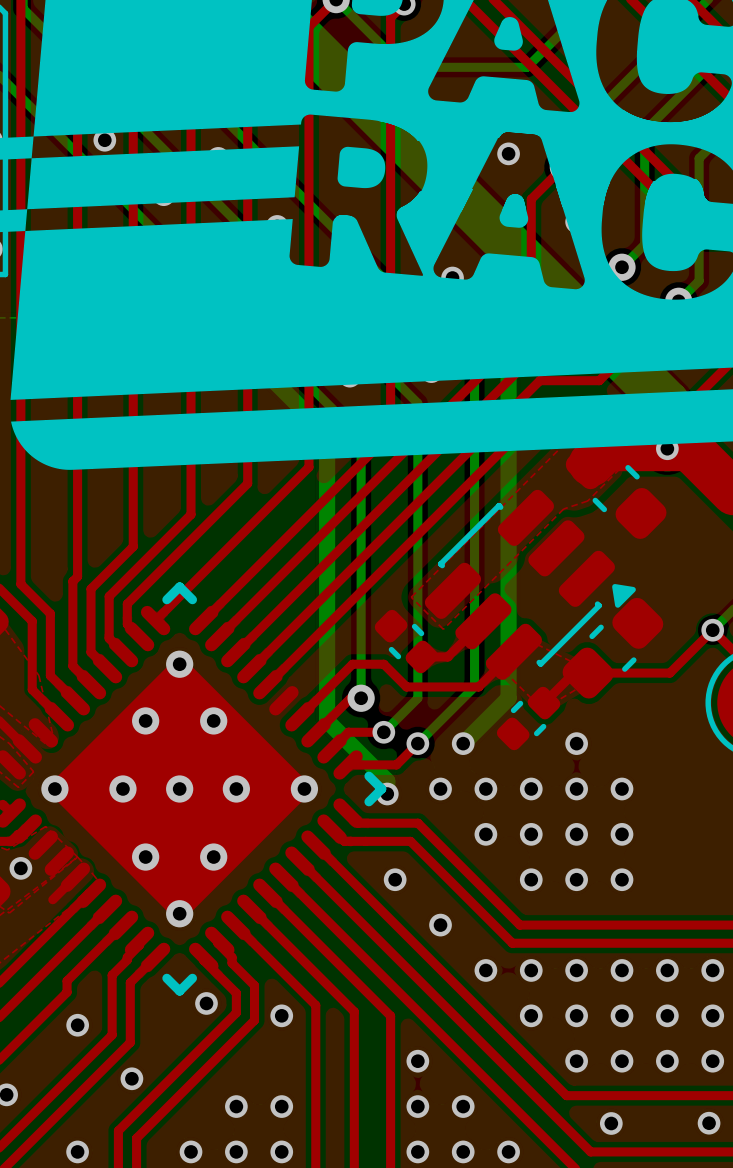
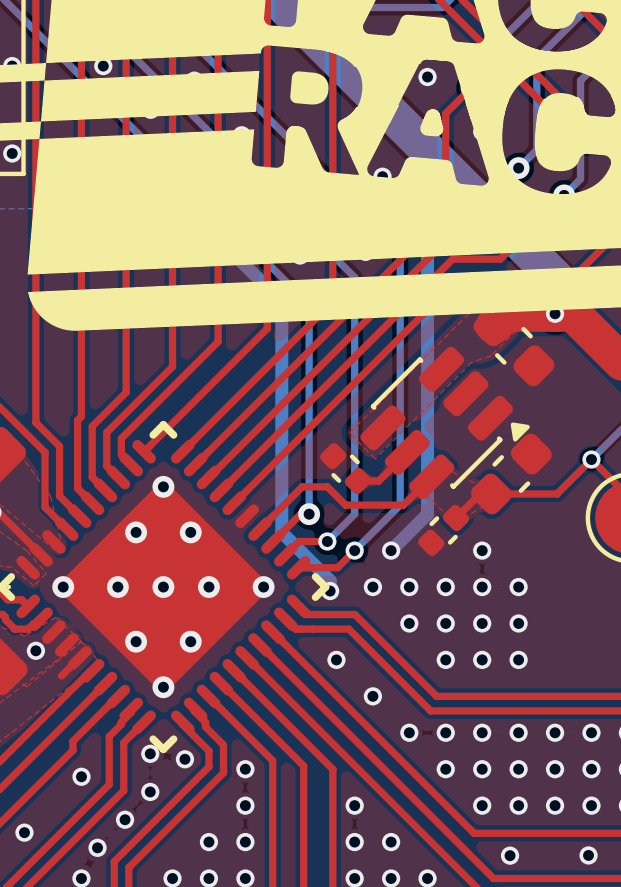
via: none -> (150, 753)
via: none -> (150, 791)
via: none -> (245, 805)
via: none -> (97, 847)

